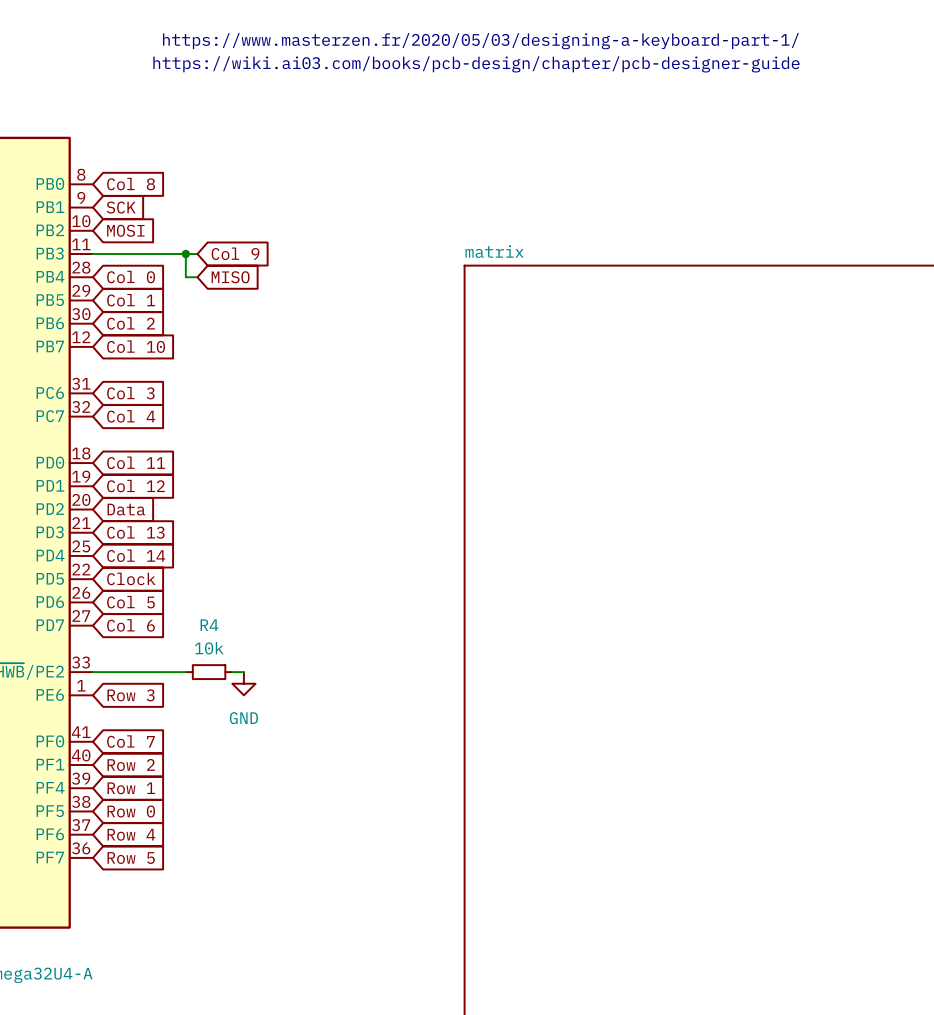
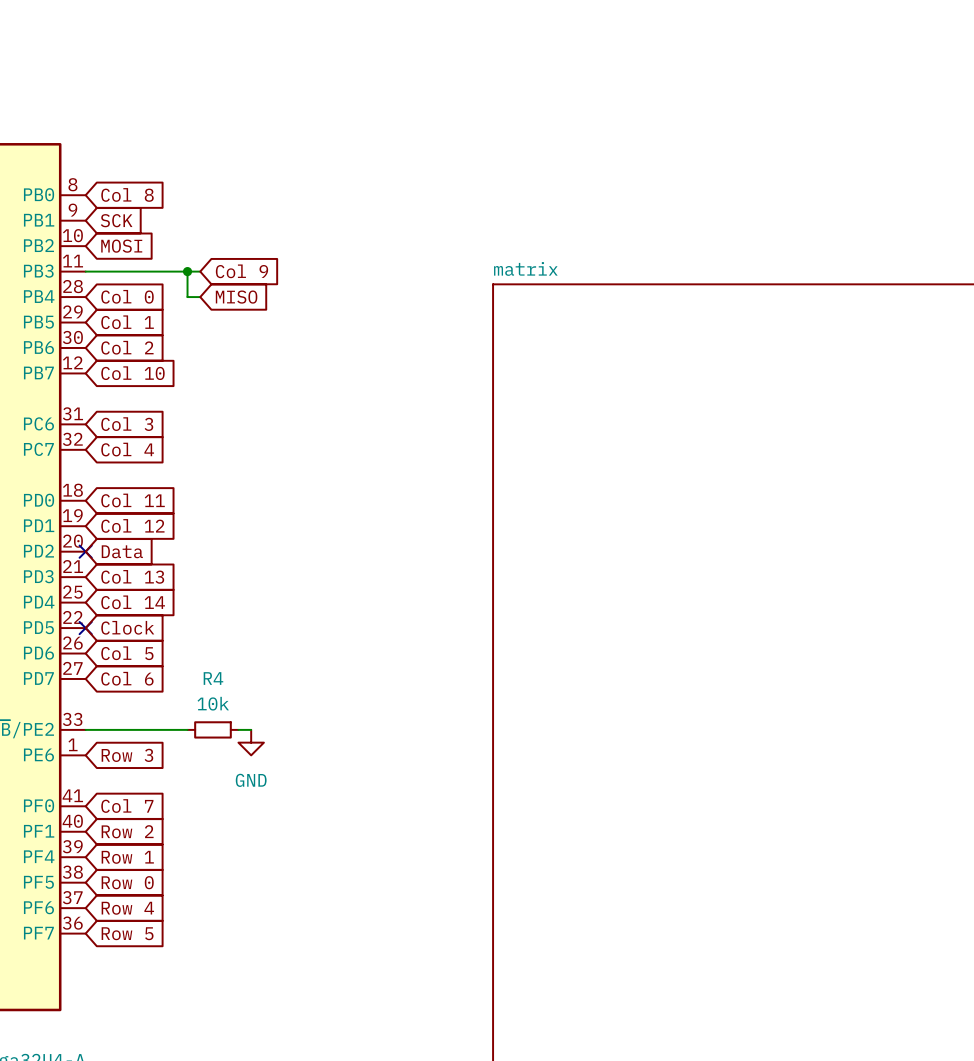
text: https://www.masterzen.fr/2020/05/03/designing-a-keyboard-part-1/ (480, 41) -> none
text: https://wiki.ai03.com/books/pcb-design/chapter/pcb-designer-guide (476, 64) -> none
no-connect mark: none -> (85, 551)
no-connect mark: none -> (85, 628)

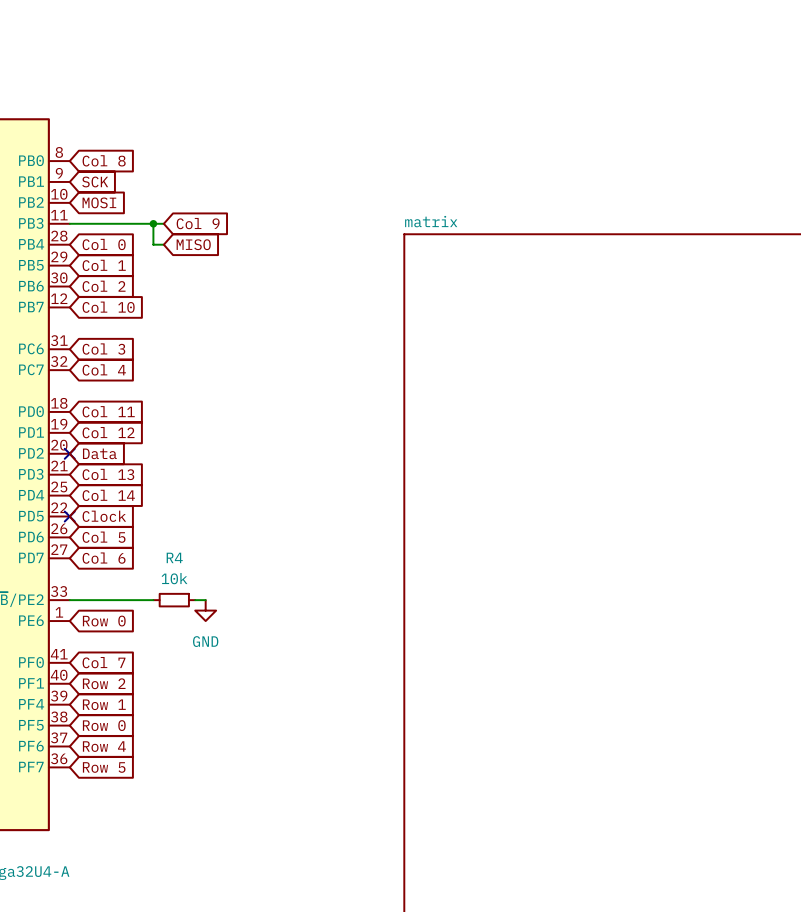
global label: Row 3 (127, 755) -> Row 0 (104, 621)

